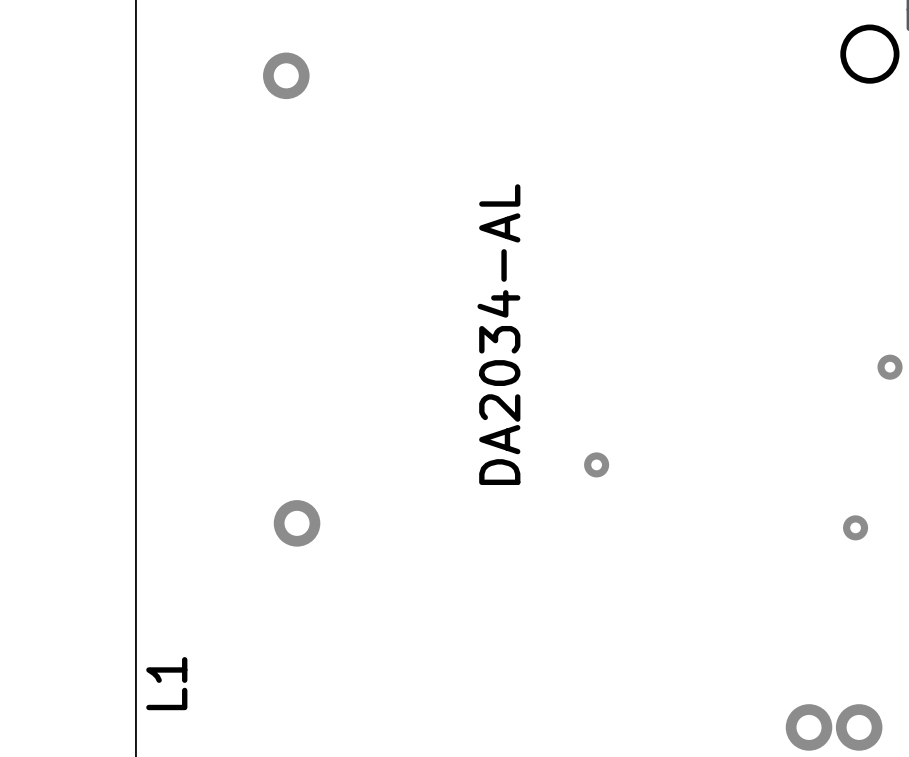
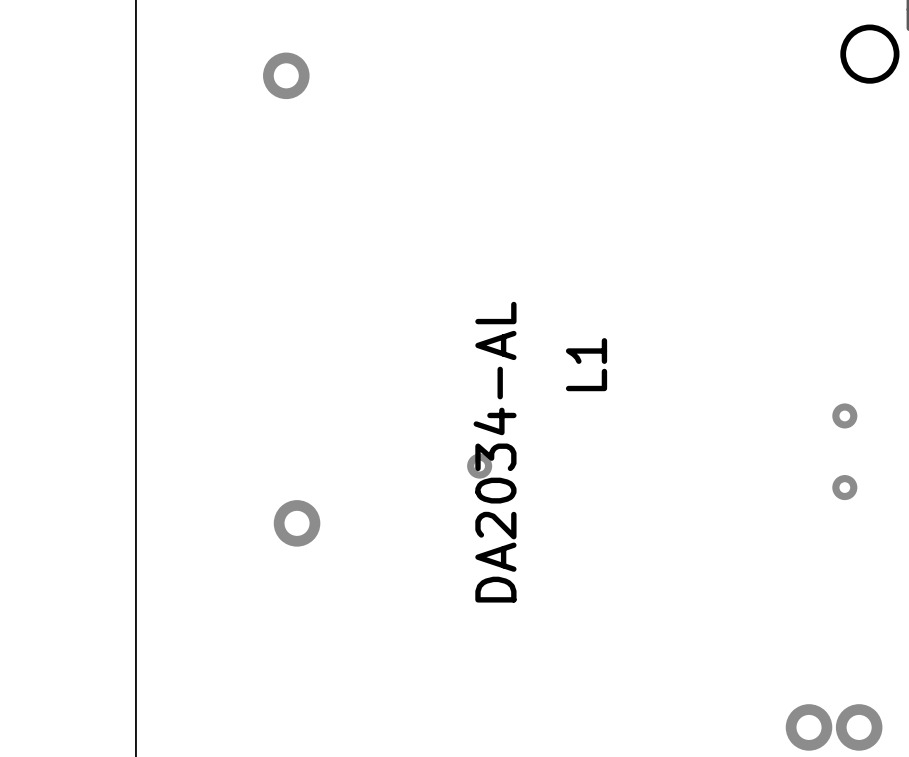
L1 value position: DA2034-AL (498, 334) -> DA2034-AL (495, 452)
via: (890, 367) -> none
via: none -> (844, 415)
via position: (596, 464) -> (479, 466)
via position: (855, 527) -> (844, 487)
L1 name position: L1 (166, 683) -> L1 (586, 364)

